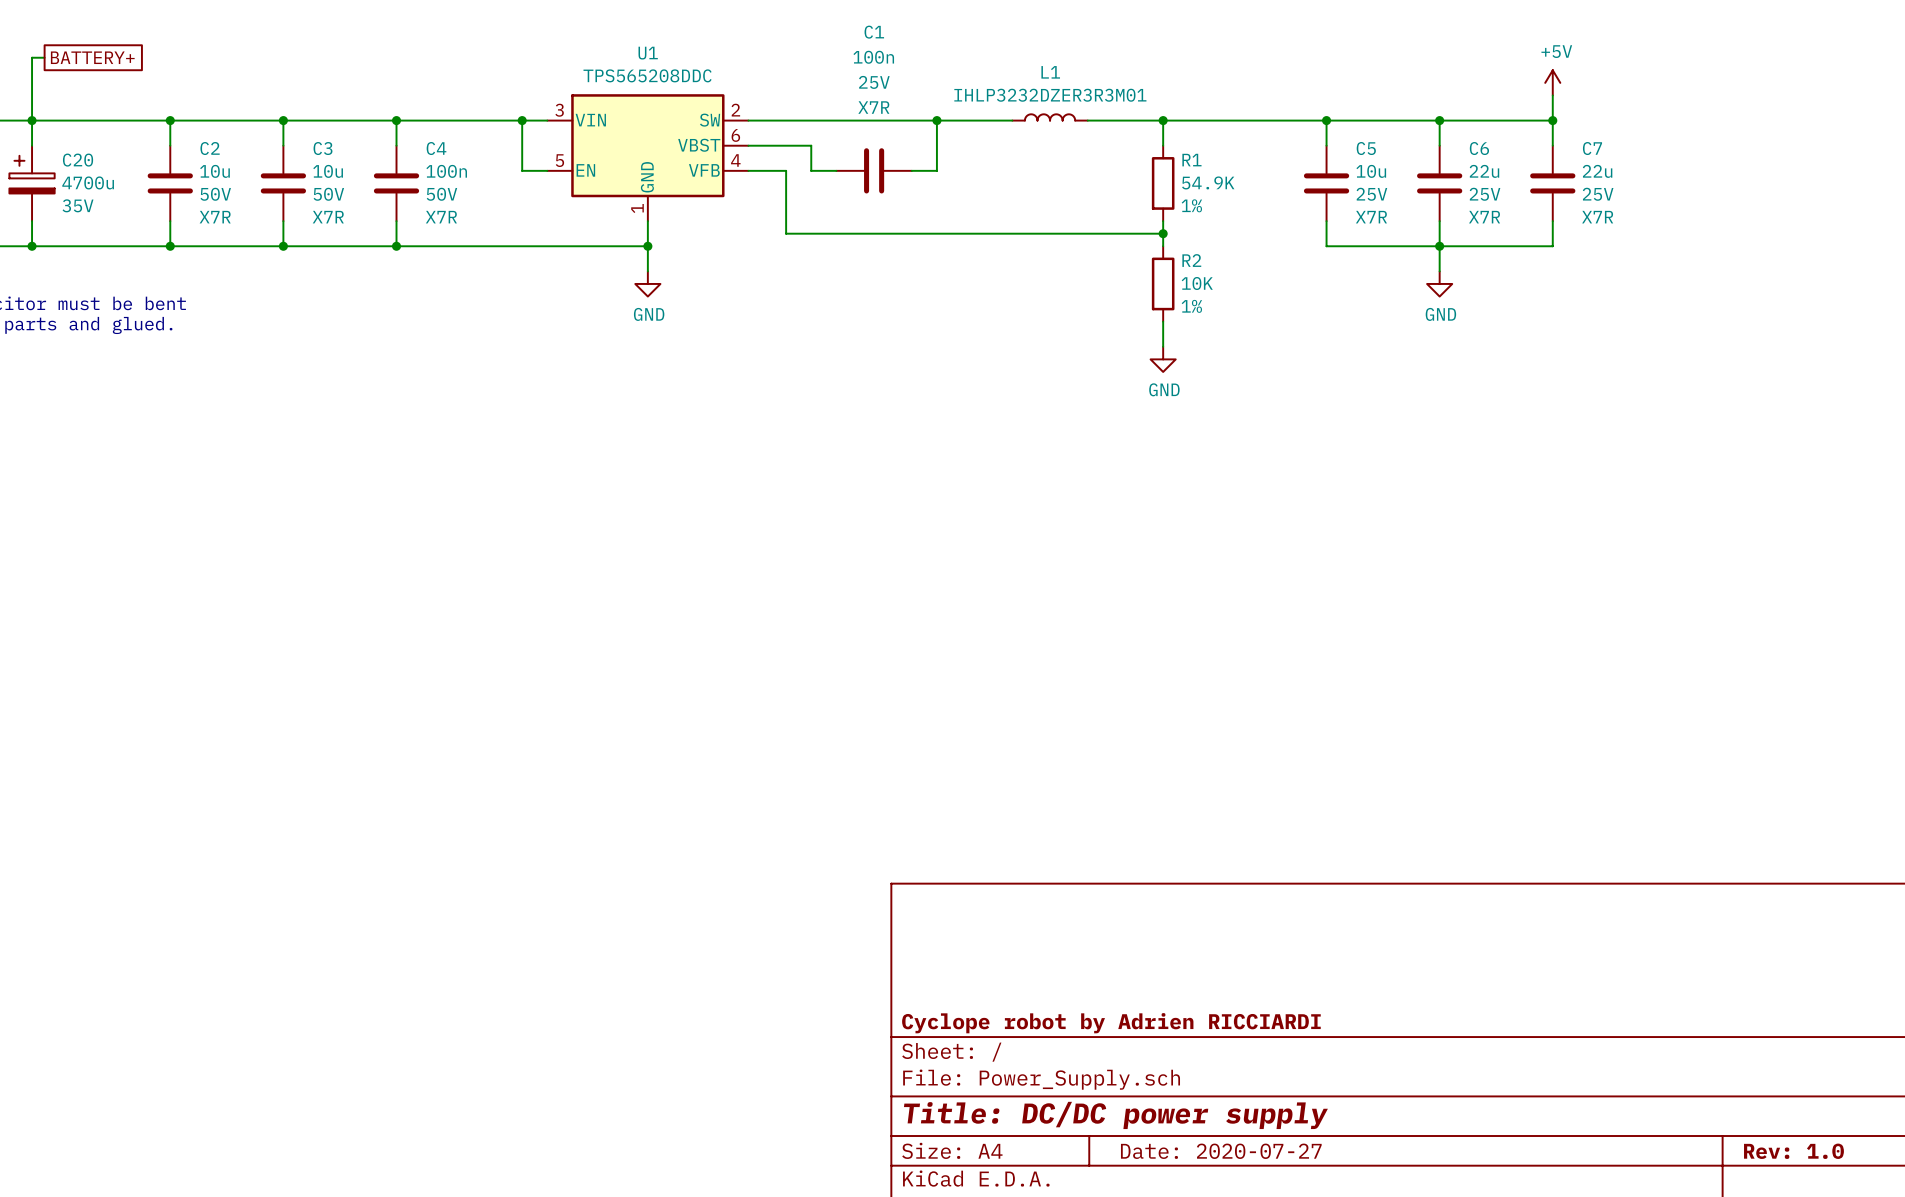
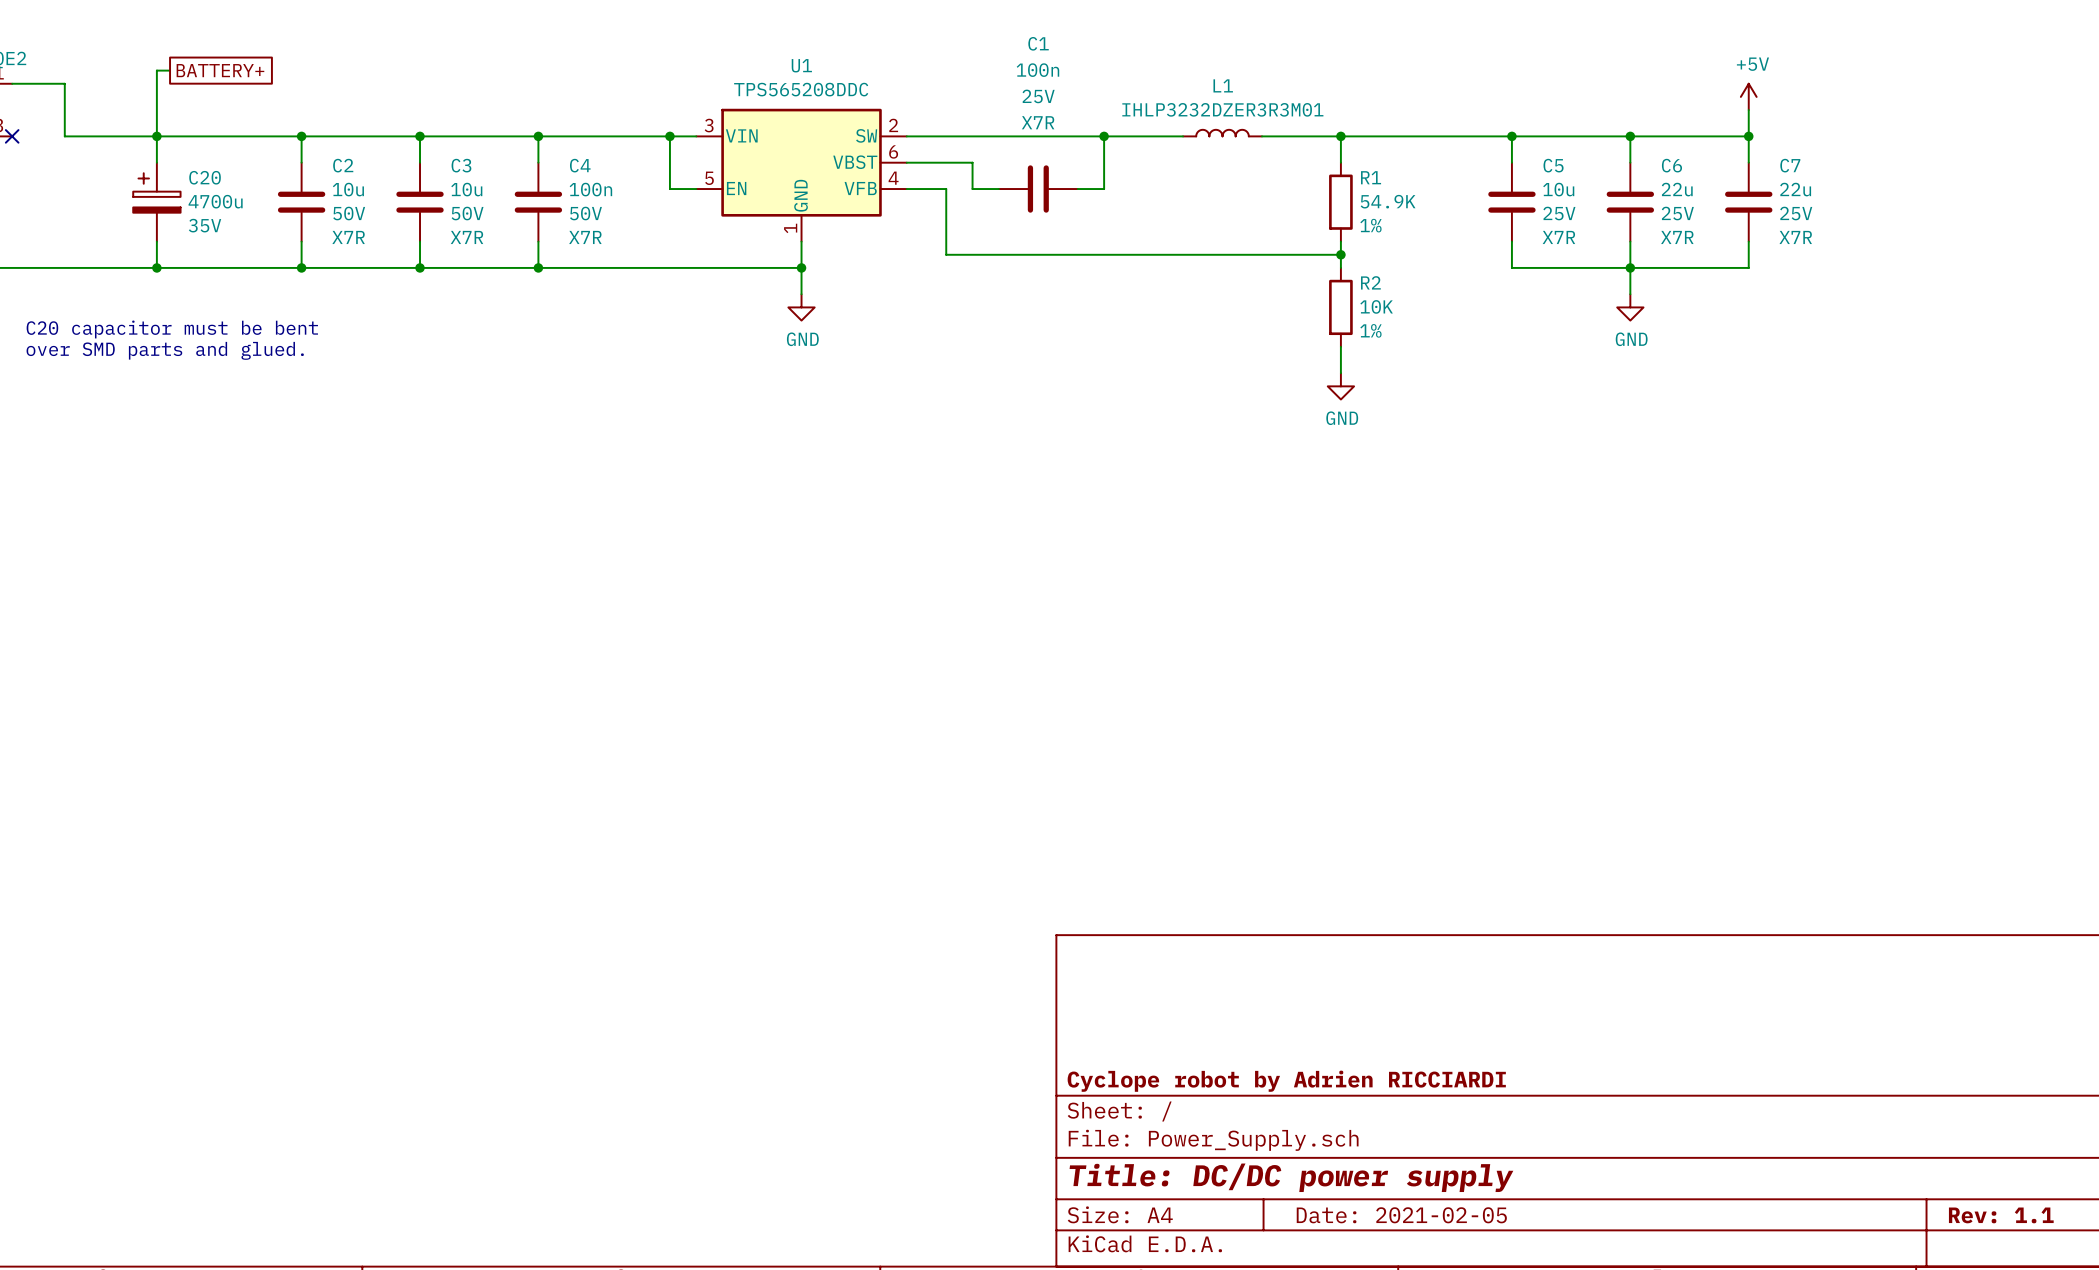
title block: Date: 2020-07-27 (1221, 1151) -> Date: 2021-02-05 (1401, 1215)
title block: Rev: 1.0 (1793, 1151) -> Rev: 1.1 (2001, 1215)

